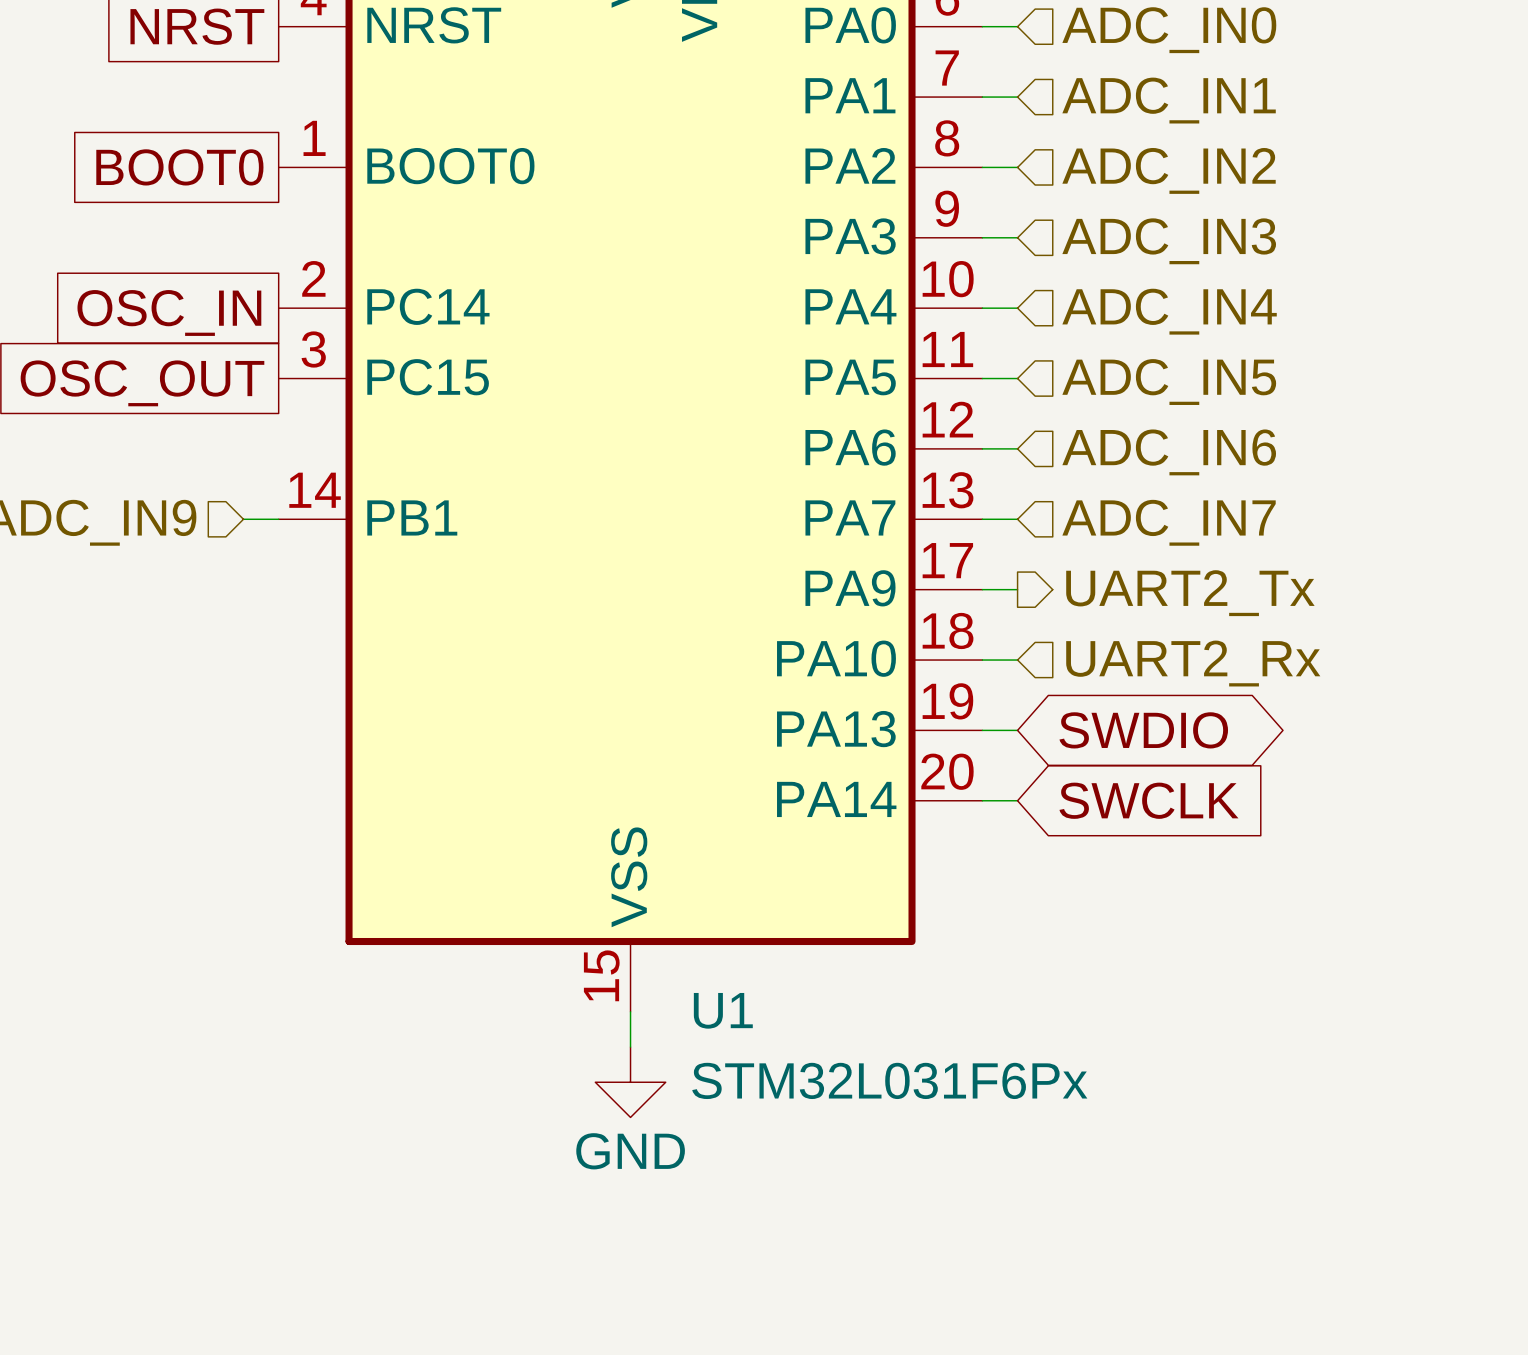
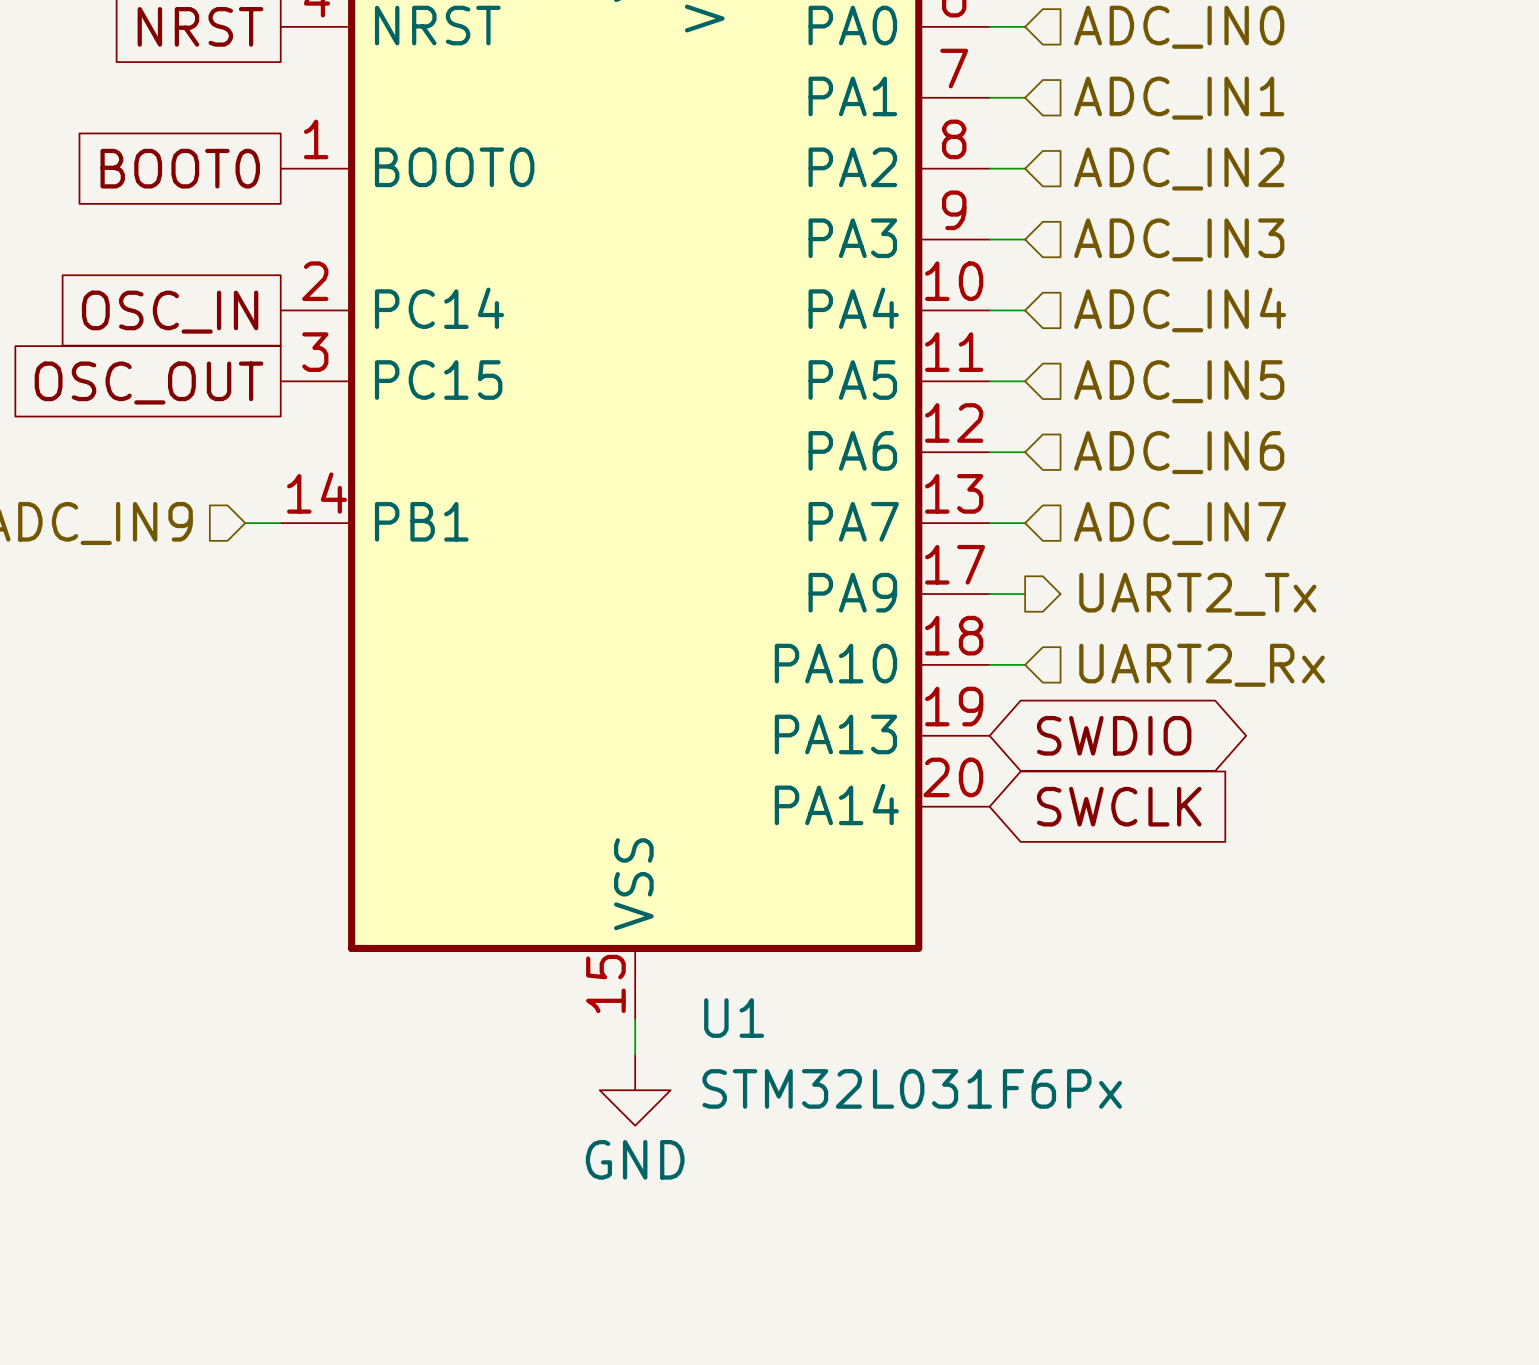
wire: (982, 730) (1017, 730) -> none
global label position: SWDIO (1143, 730) -> SWDIO (1114, 735)
wire: (982, 800) (1017, 800) -> none
global label position: SWCLK (1148, 800) -> SWCLK (1119, 806)

